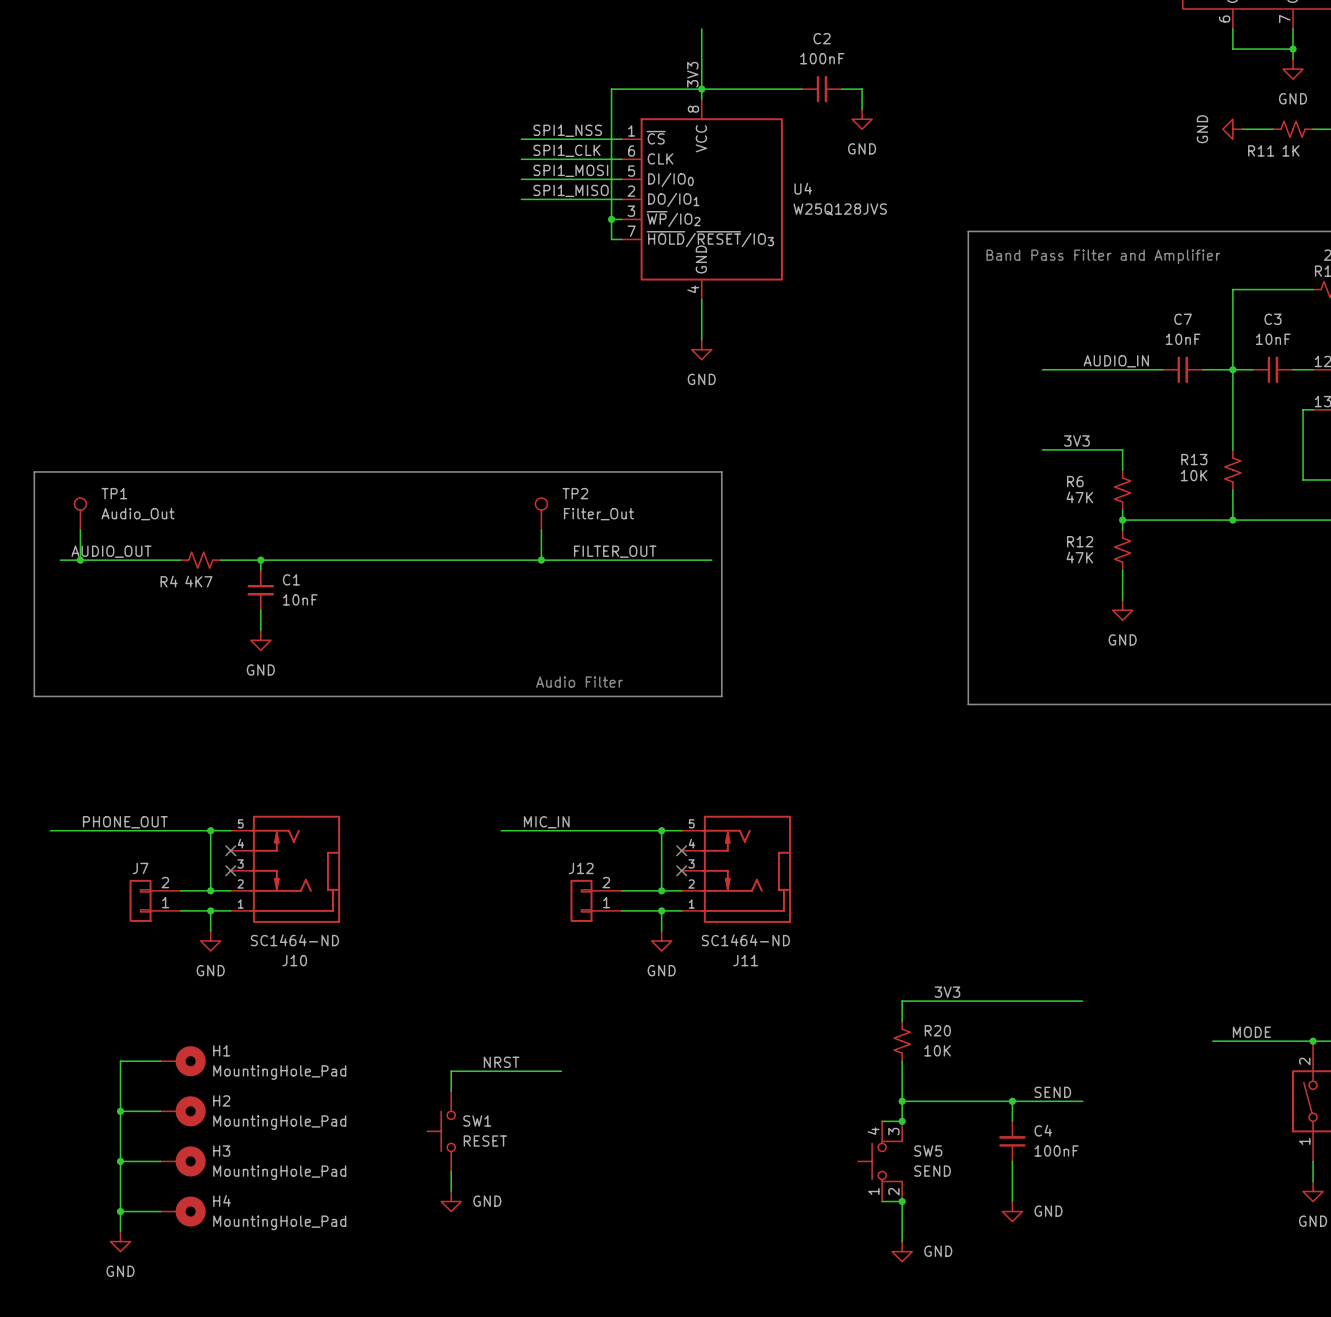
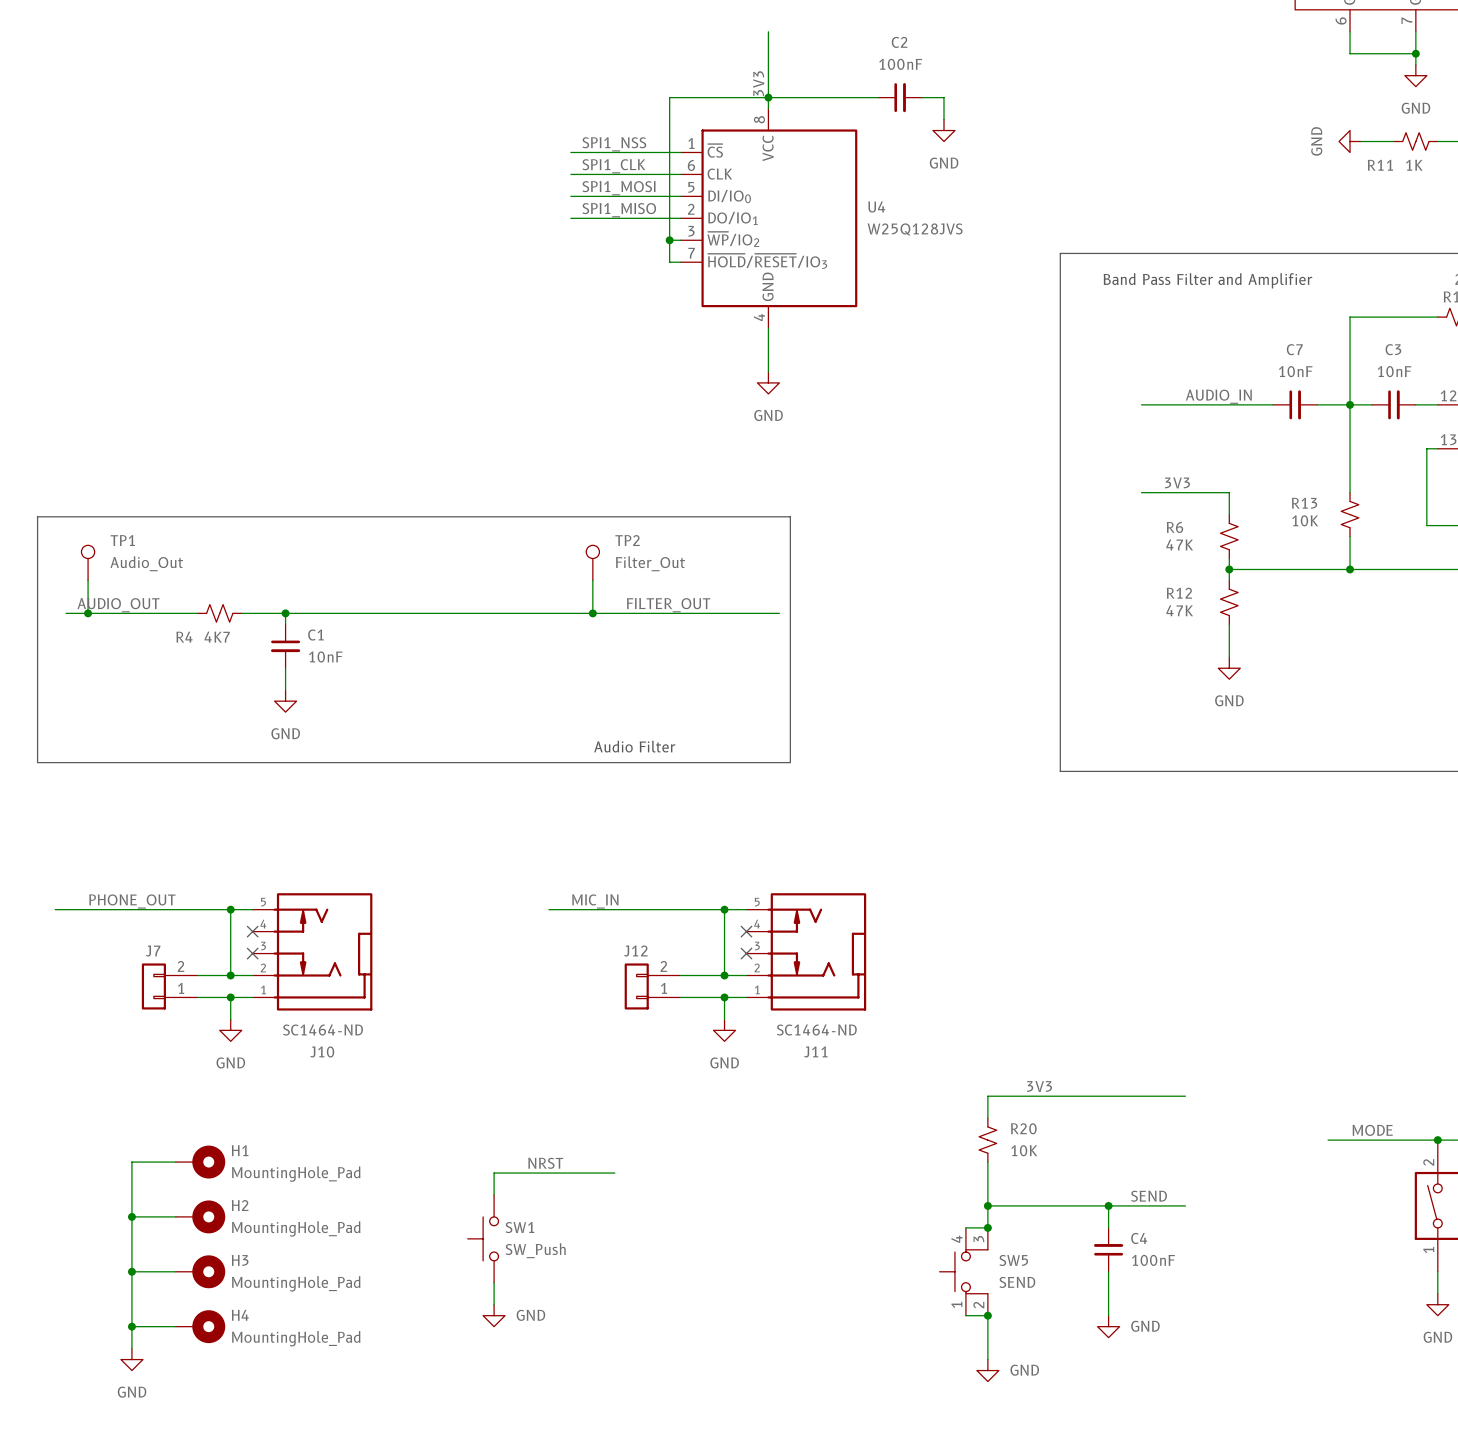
SW1 value: RESET (485, 1141) -> SW_Push (535, 1250)

